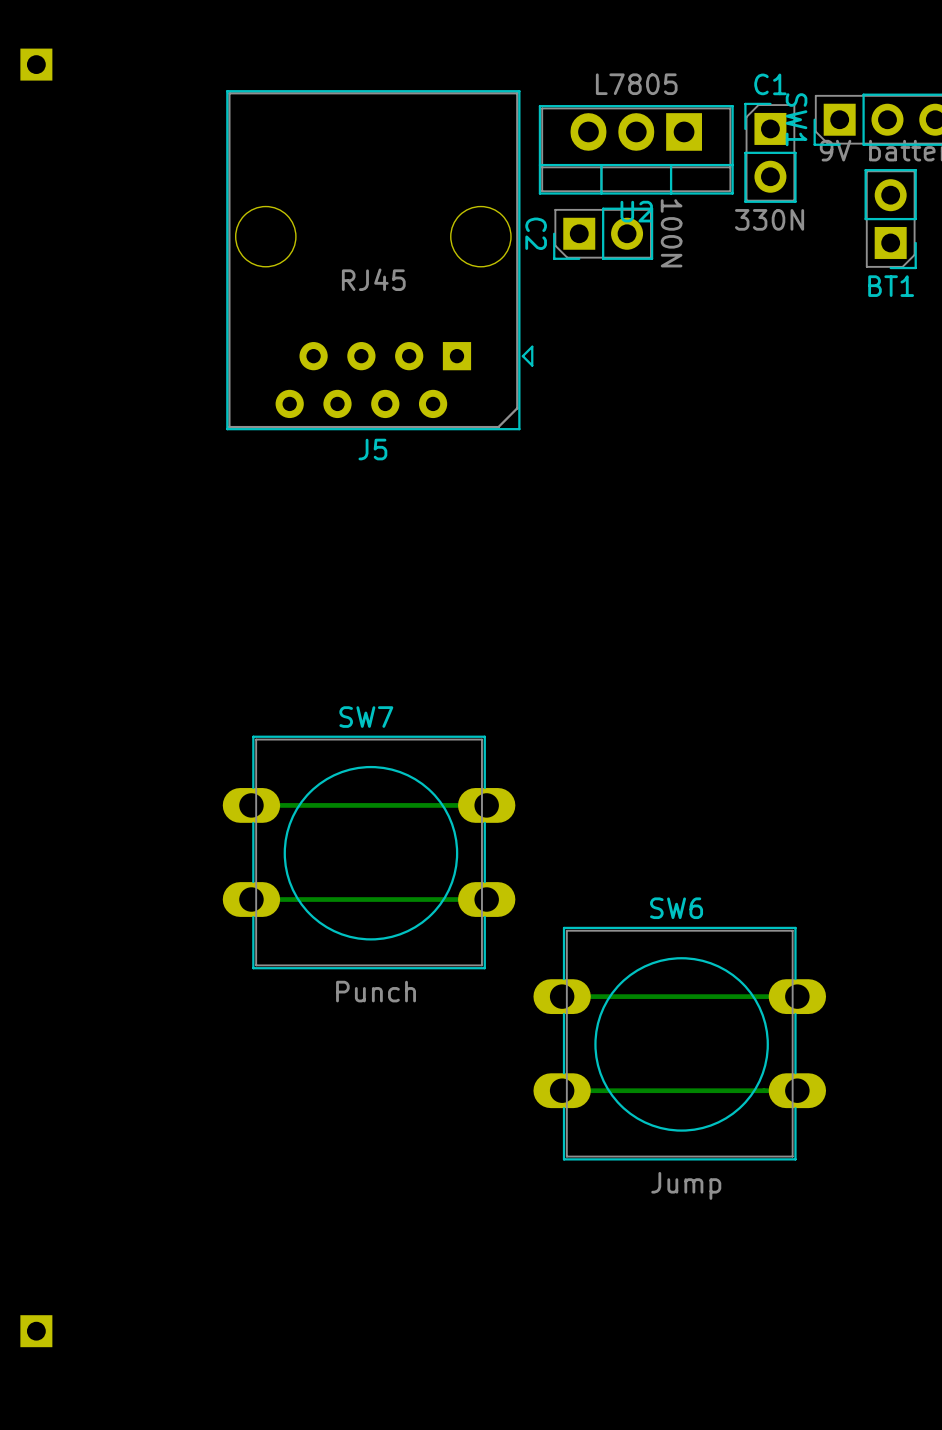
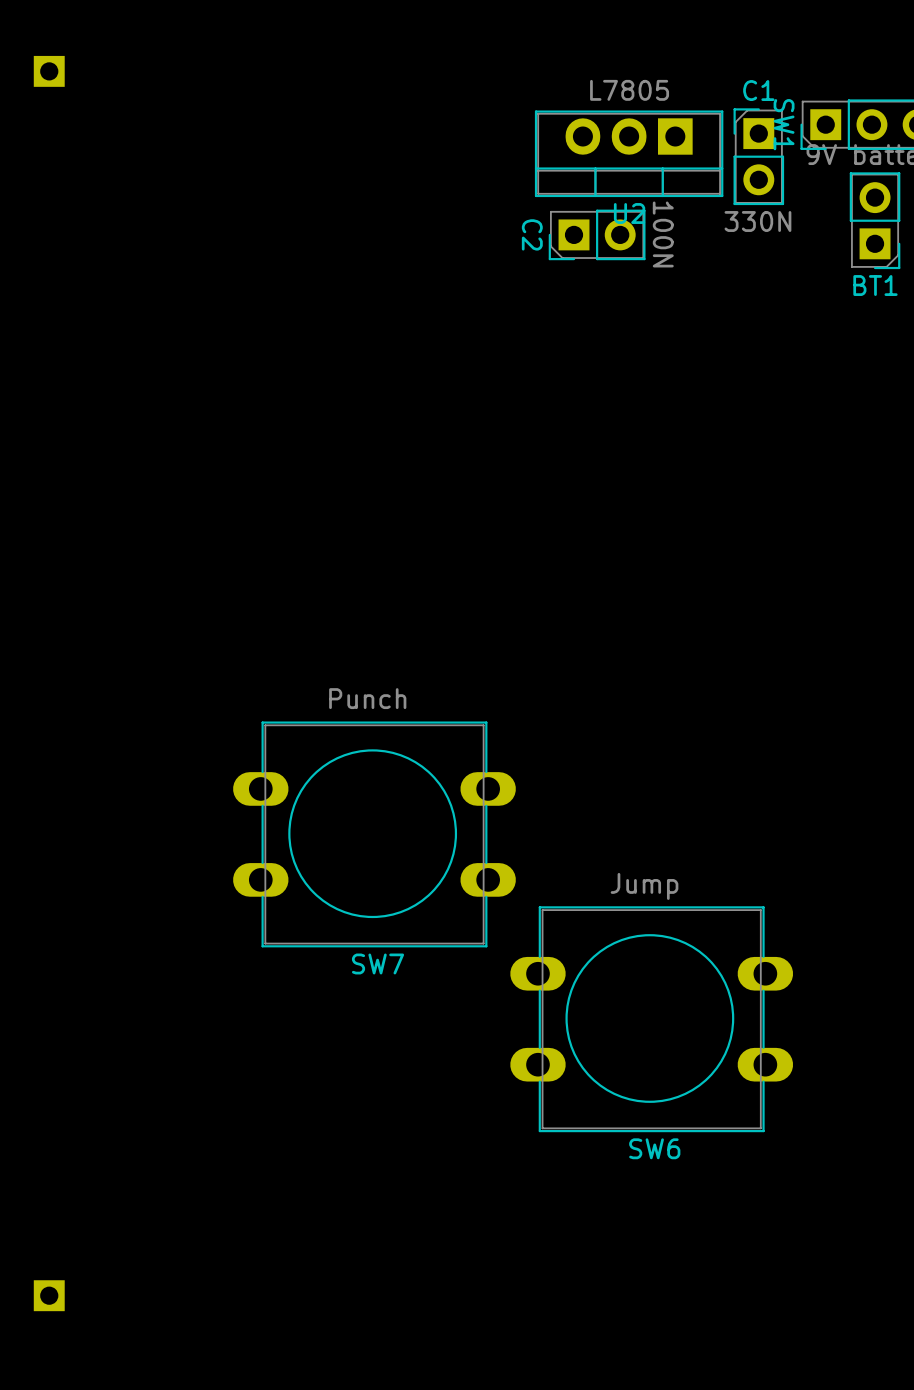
J5: RJ45 (379, 260) -> none
track: (486, 805) (251, 805) -> none
SW7 rotation: 0° (369, 852) -> 180° (374, 834)
track: (486, 899) (251, 899) -> none
track: (797, 996) (562, 996) -> none
SW6 rotation: 0° (679, 1043) -> 180° (651, 1019)
track: (797, 1090) (562, 1090) -> none

